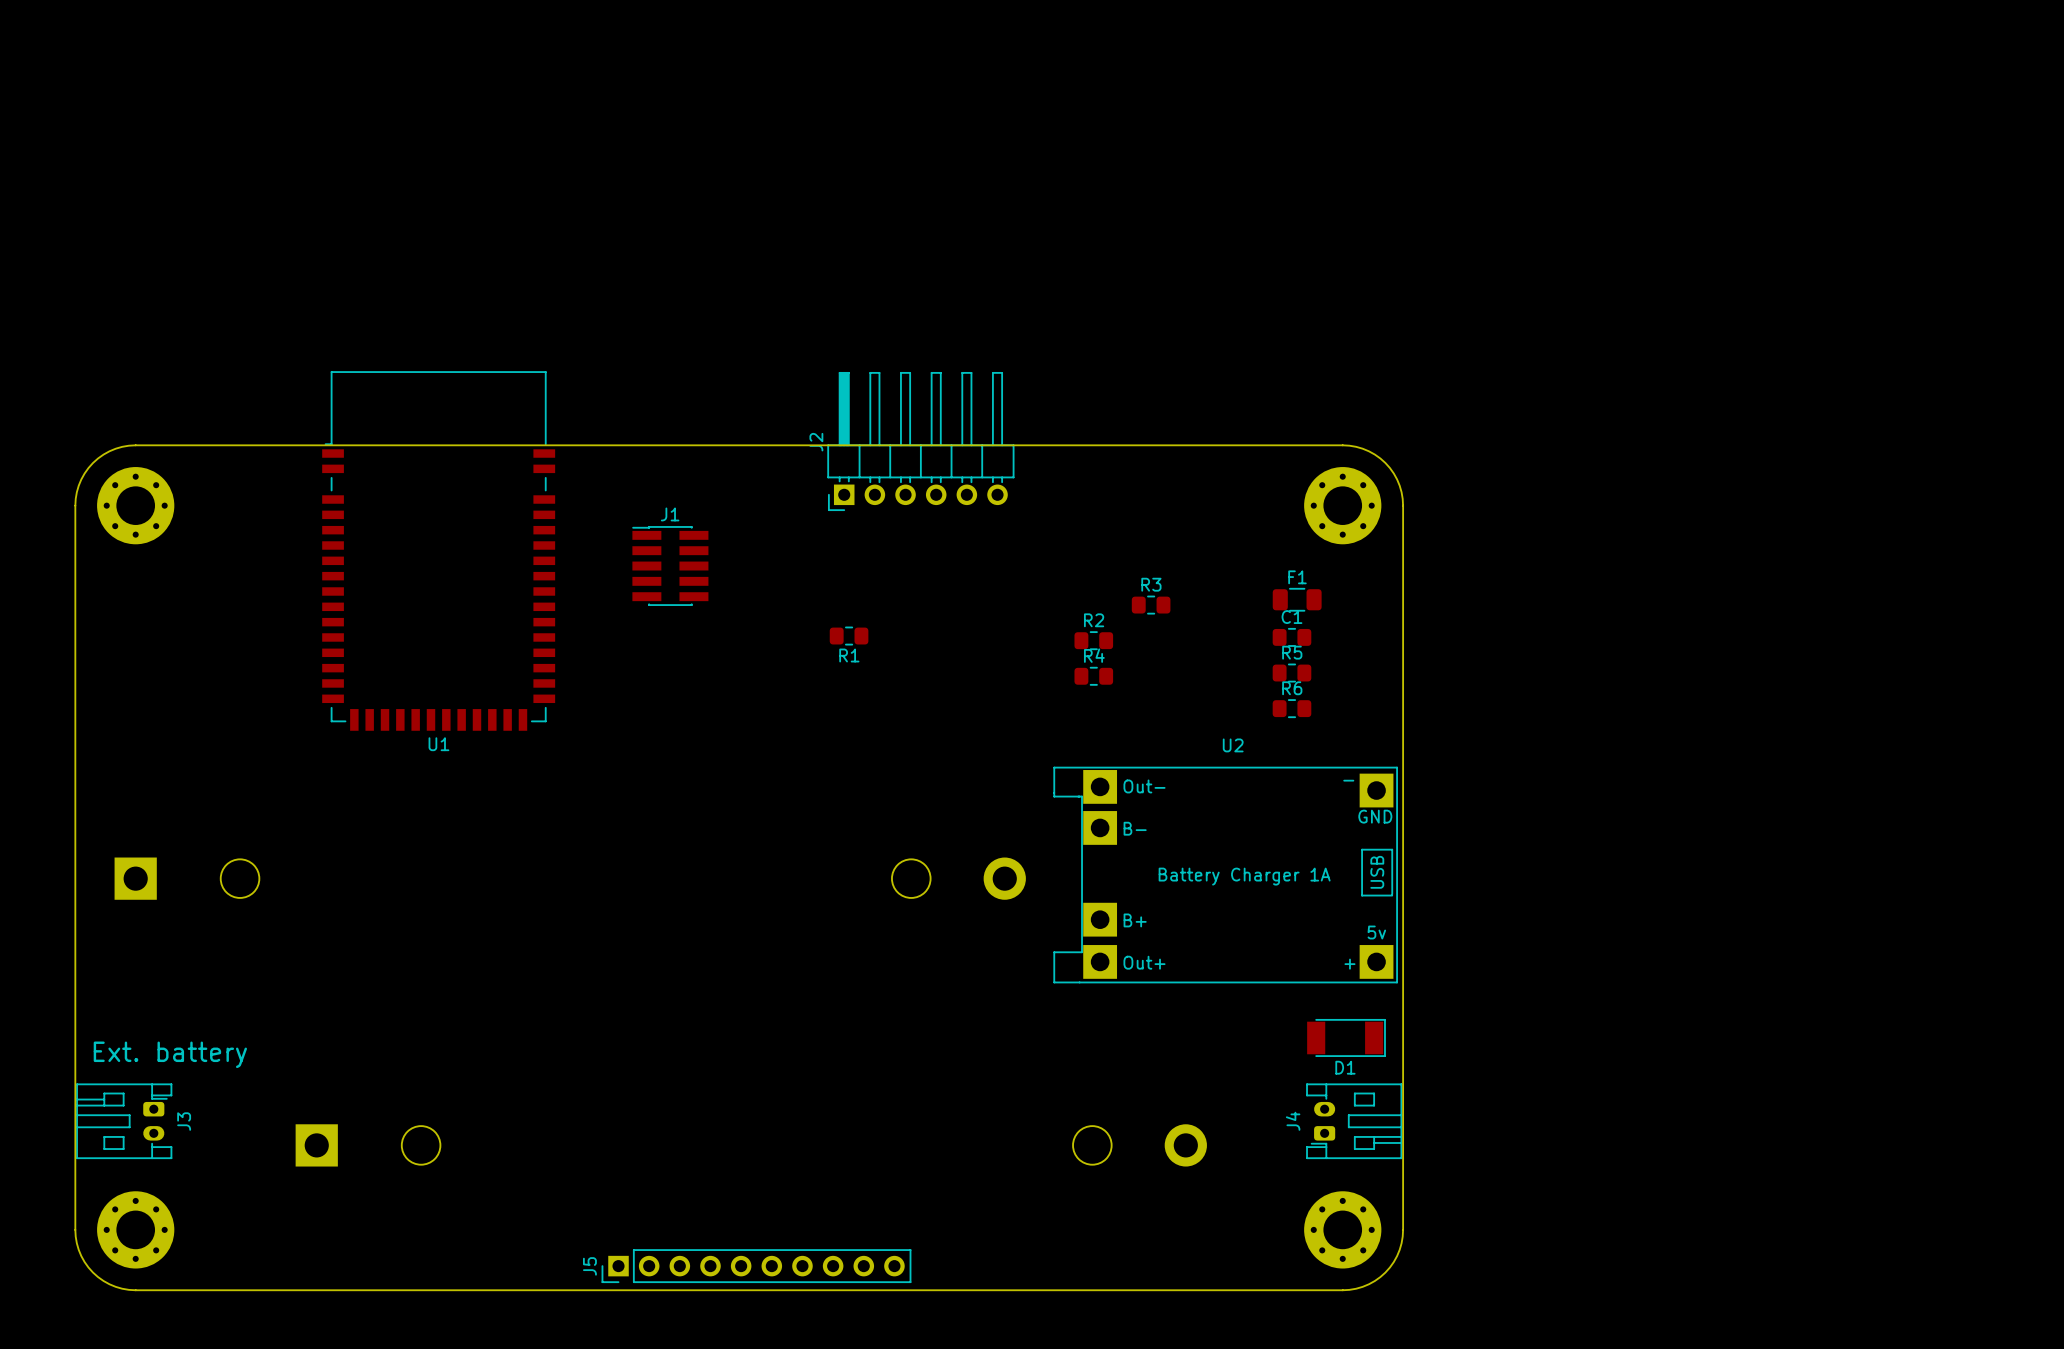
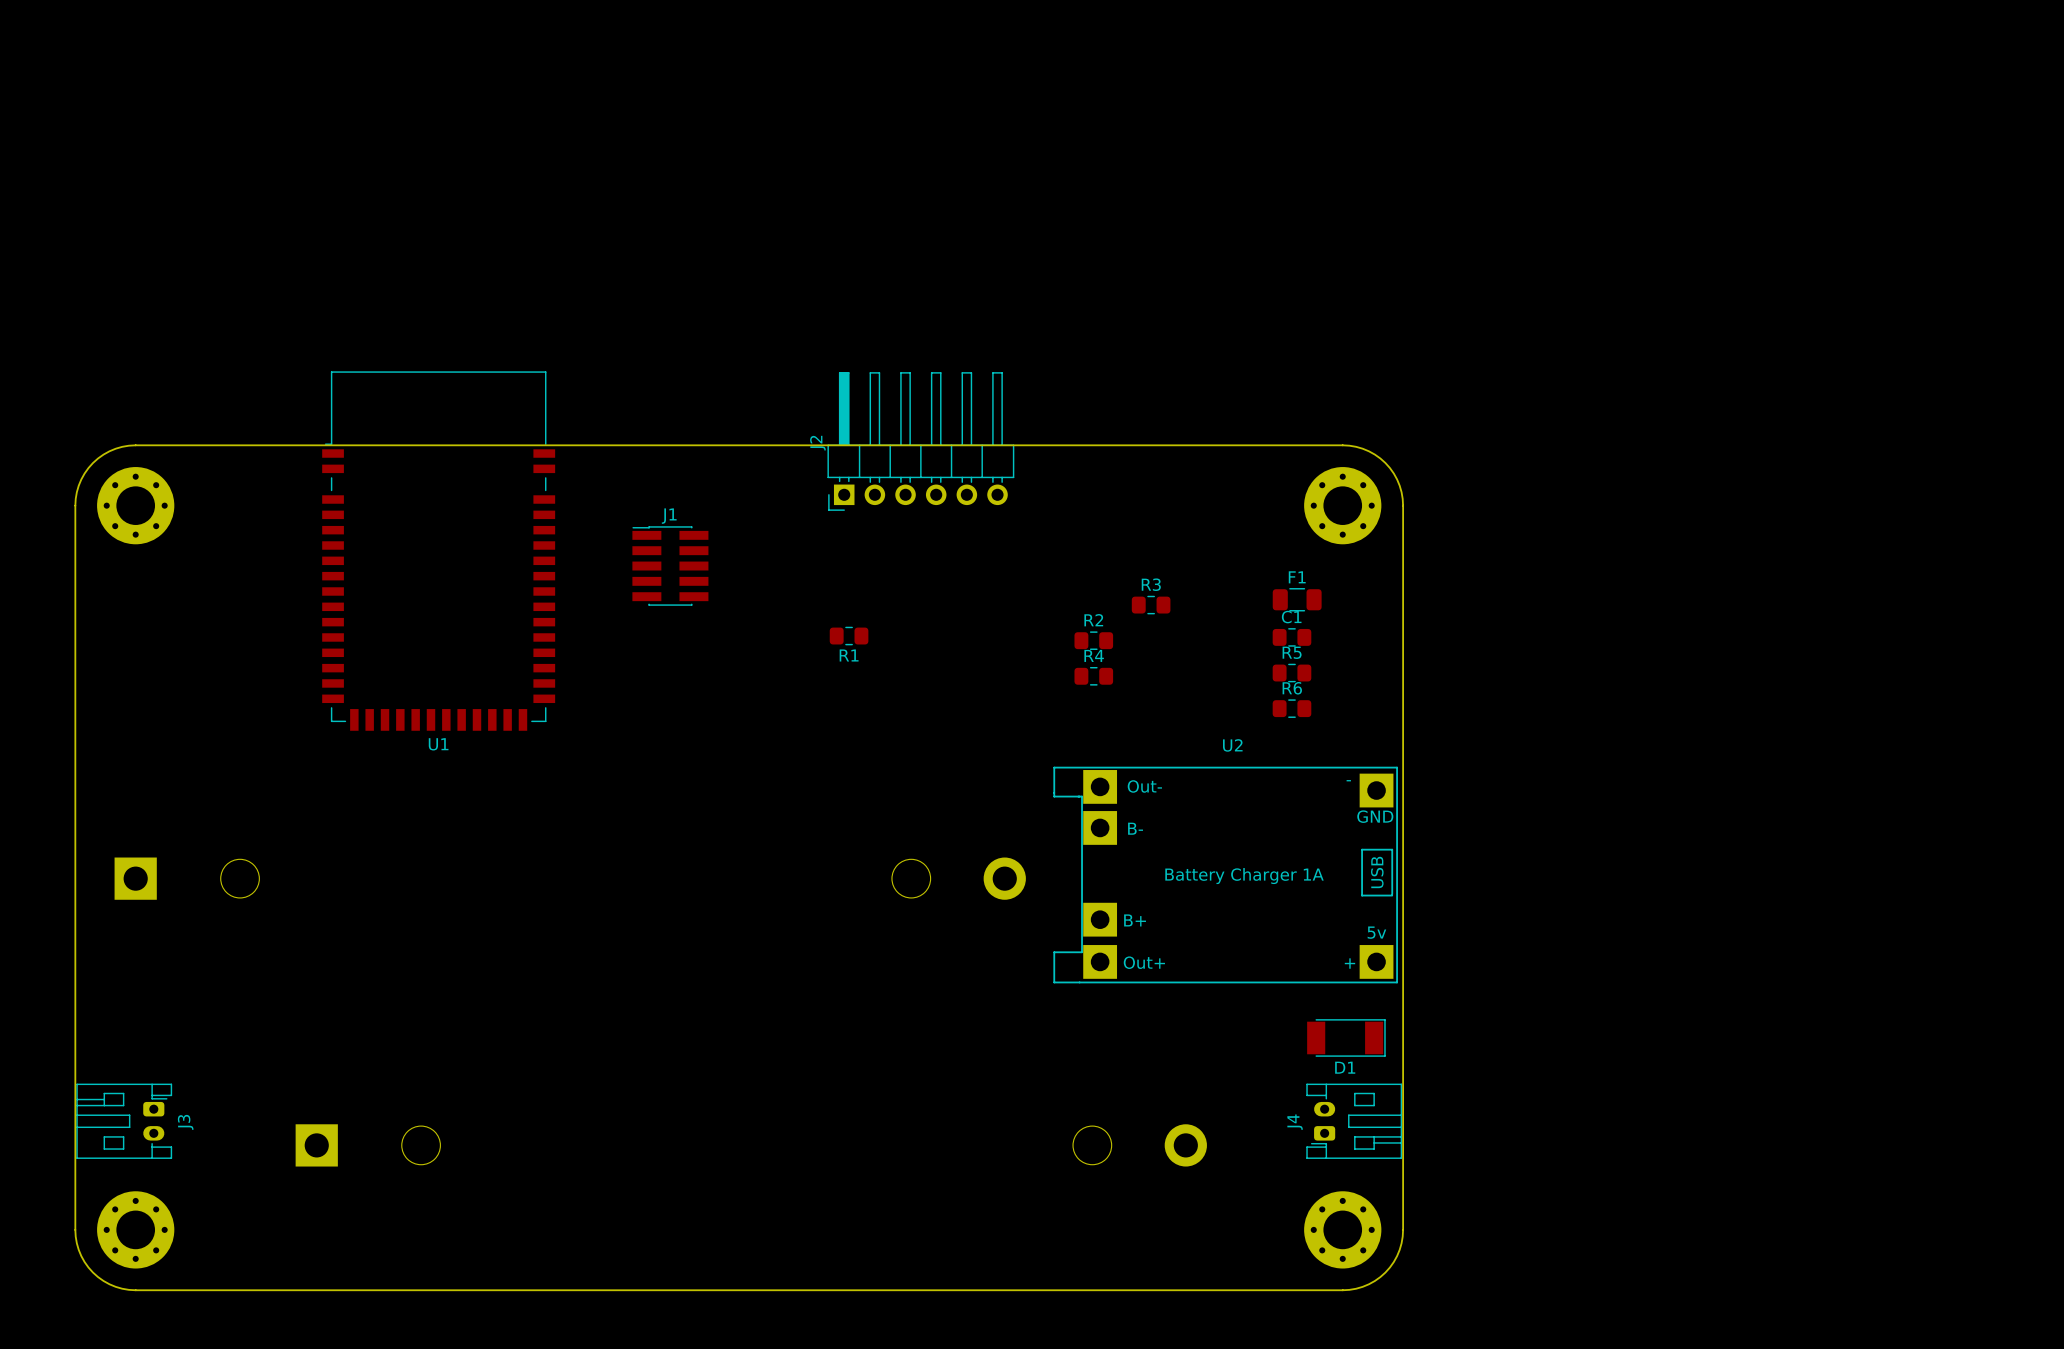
text: Ext. battery (170, 1054) -> none
J5: (756, 1266) -> none

